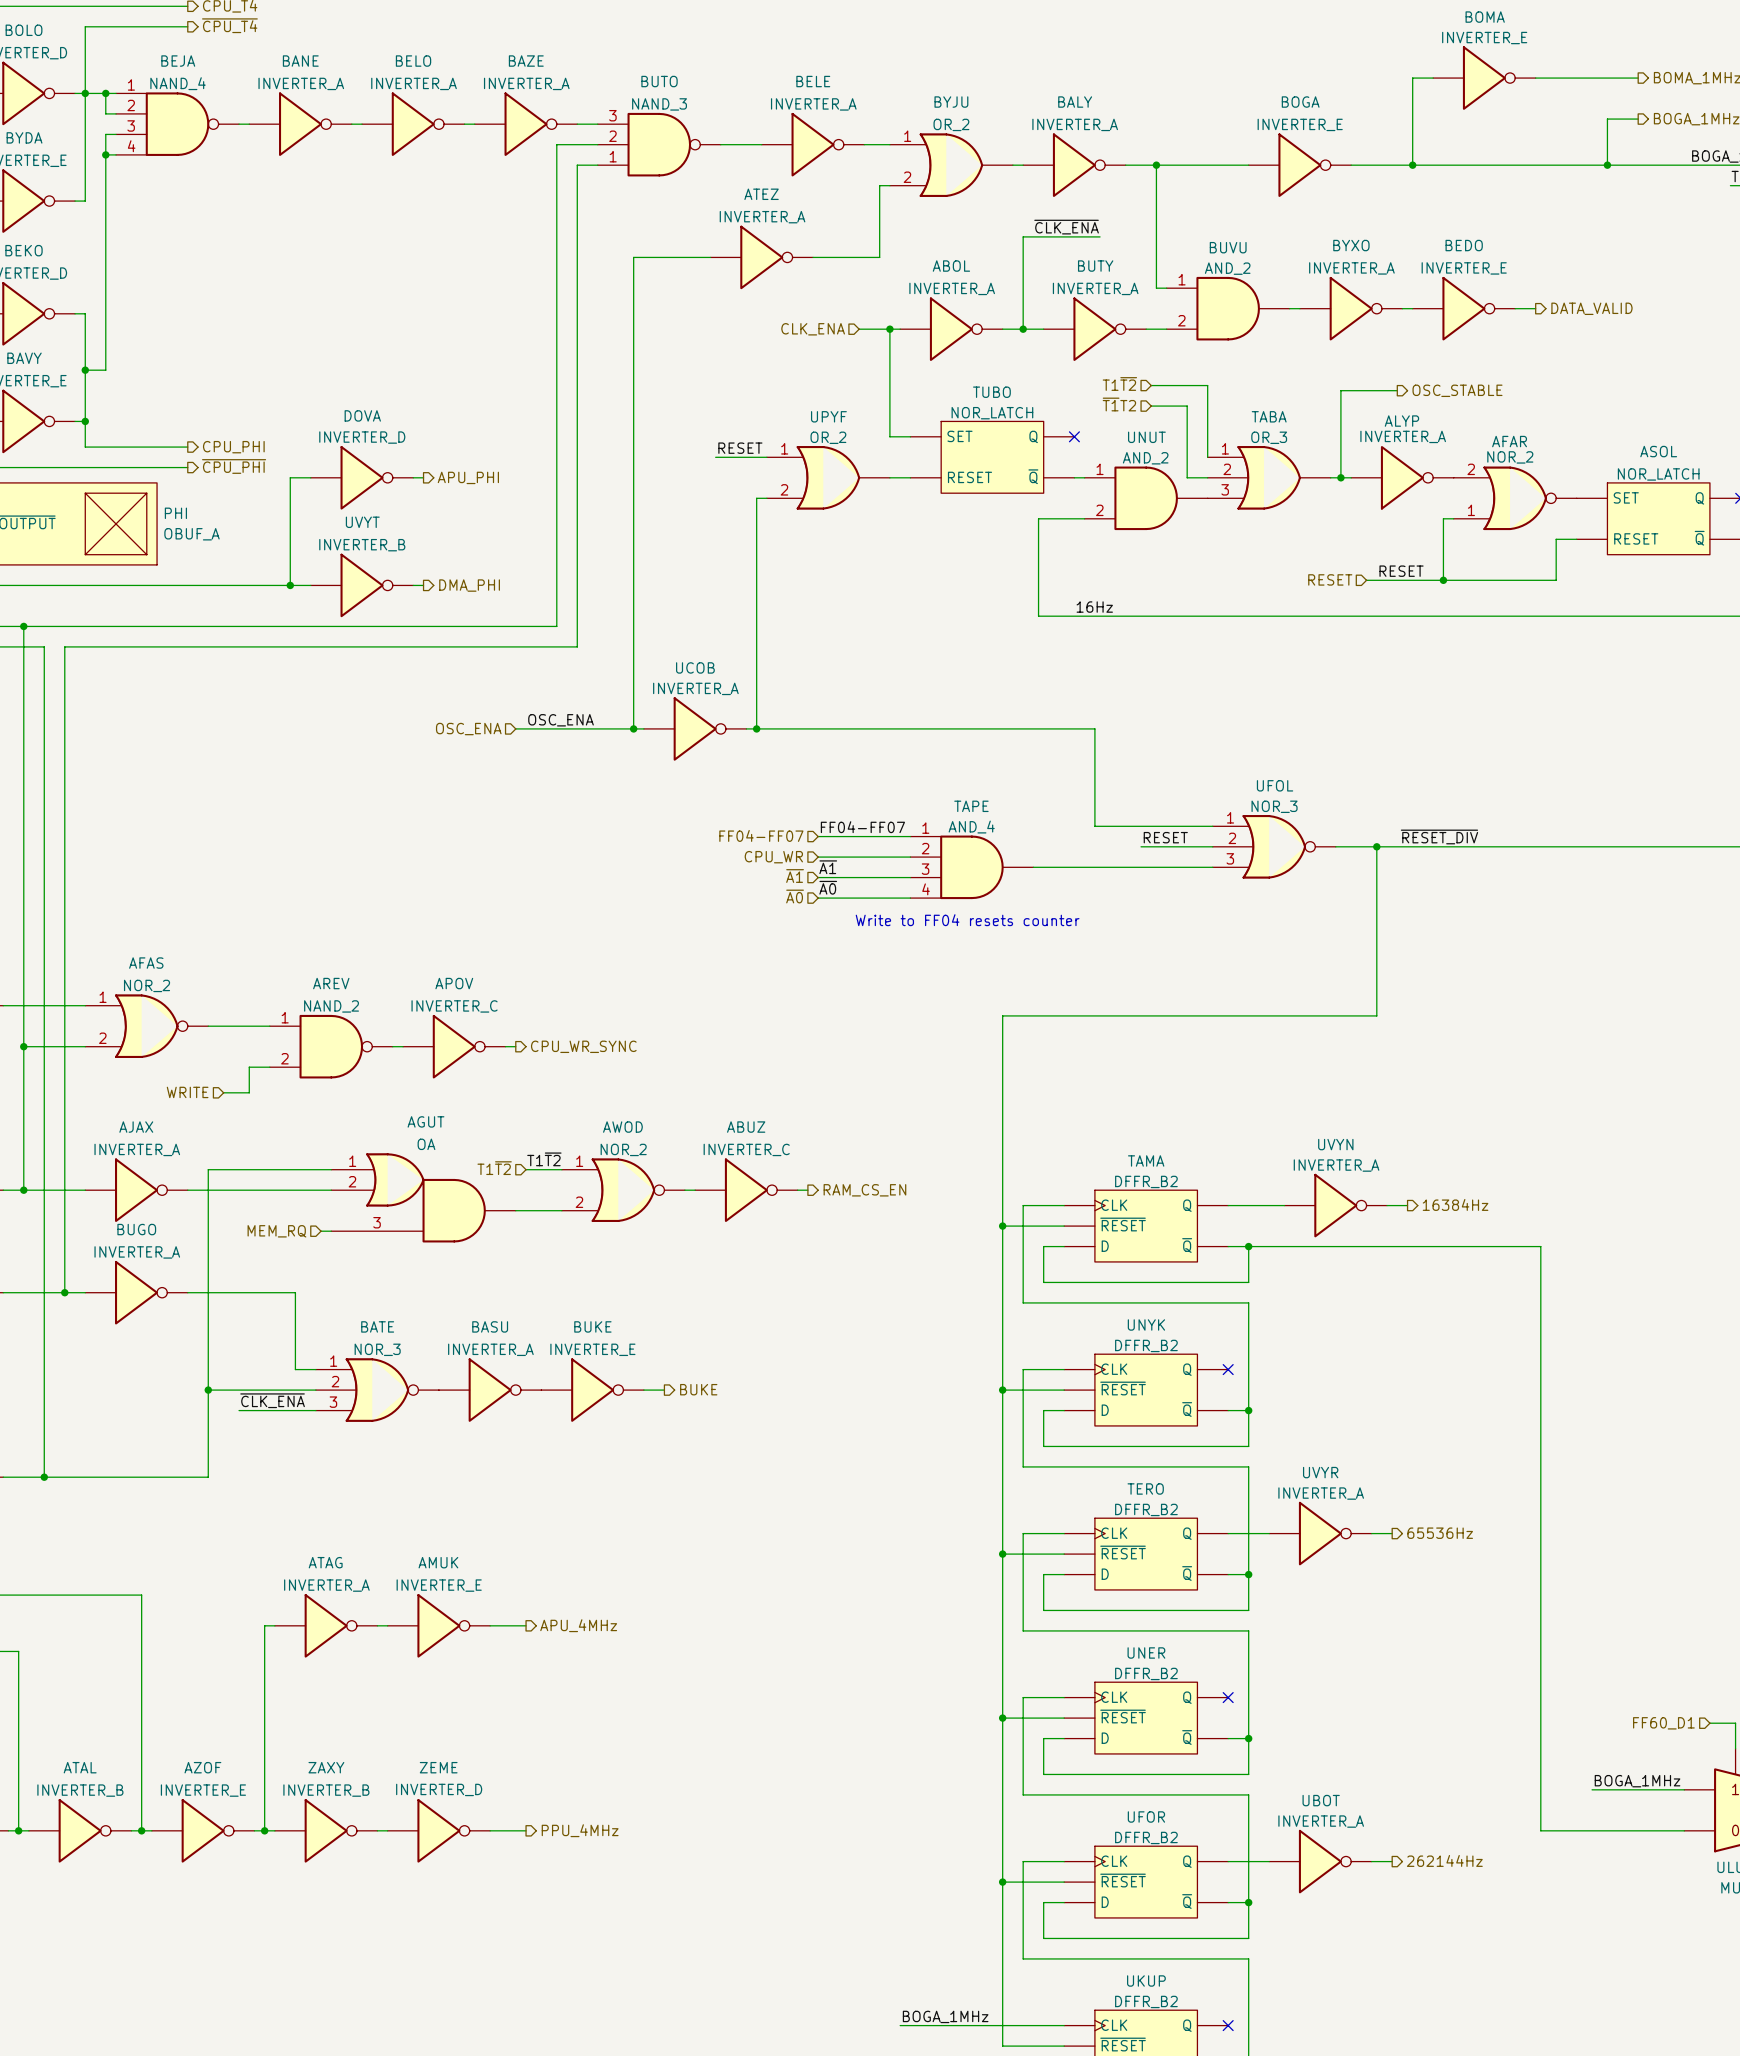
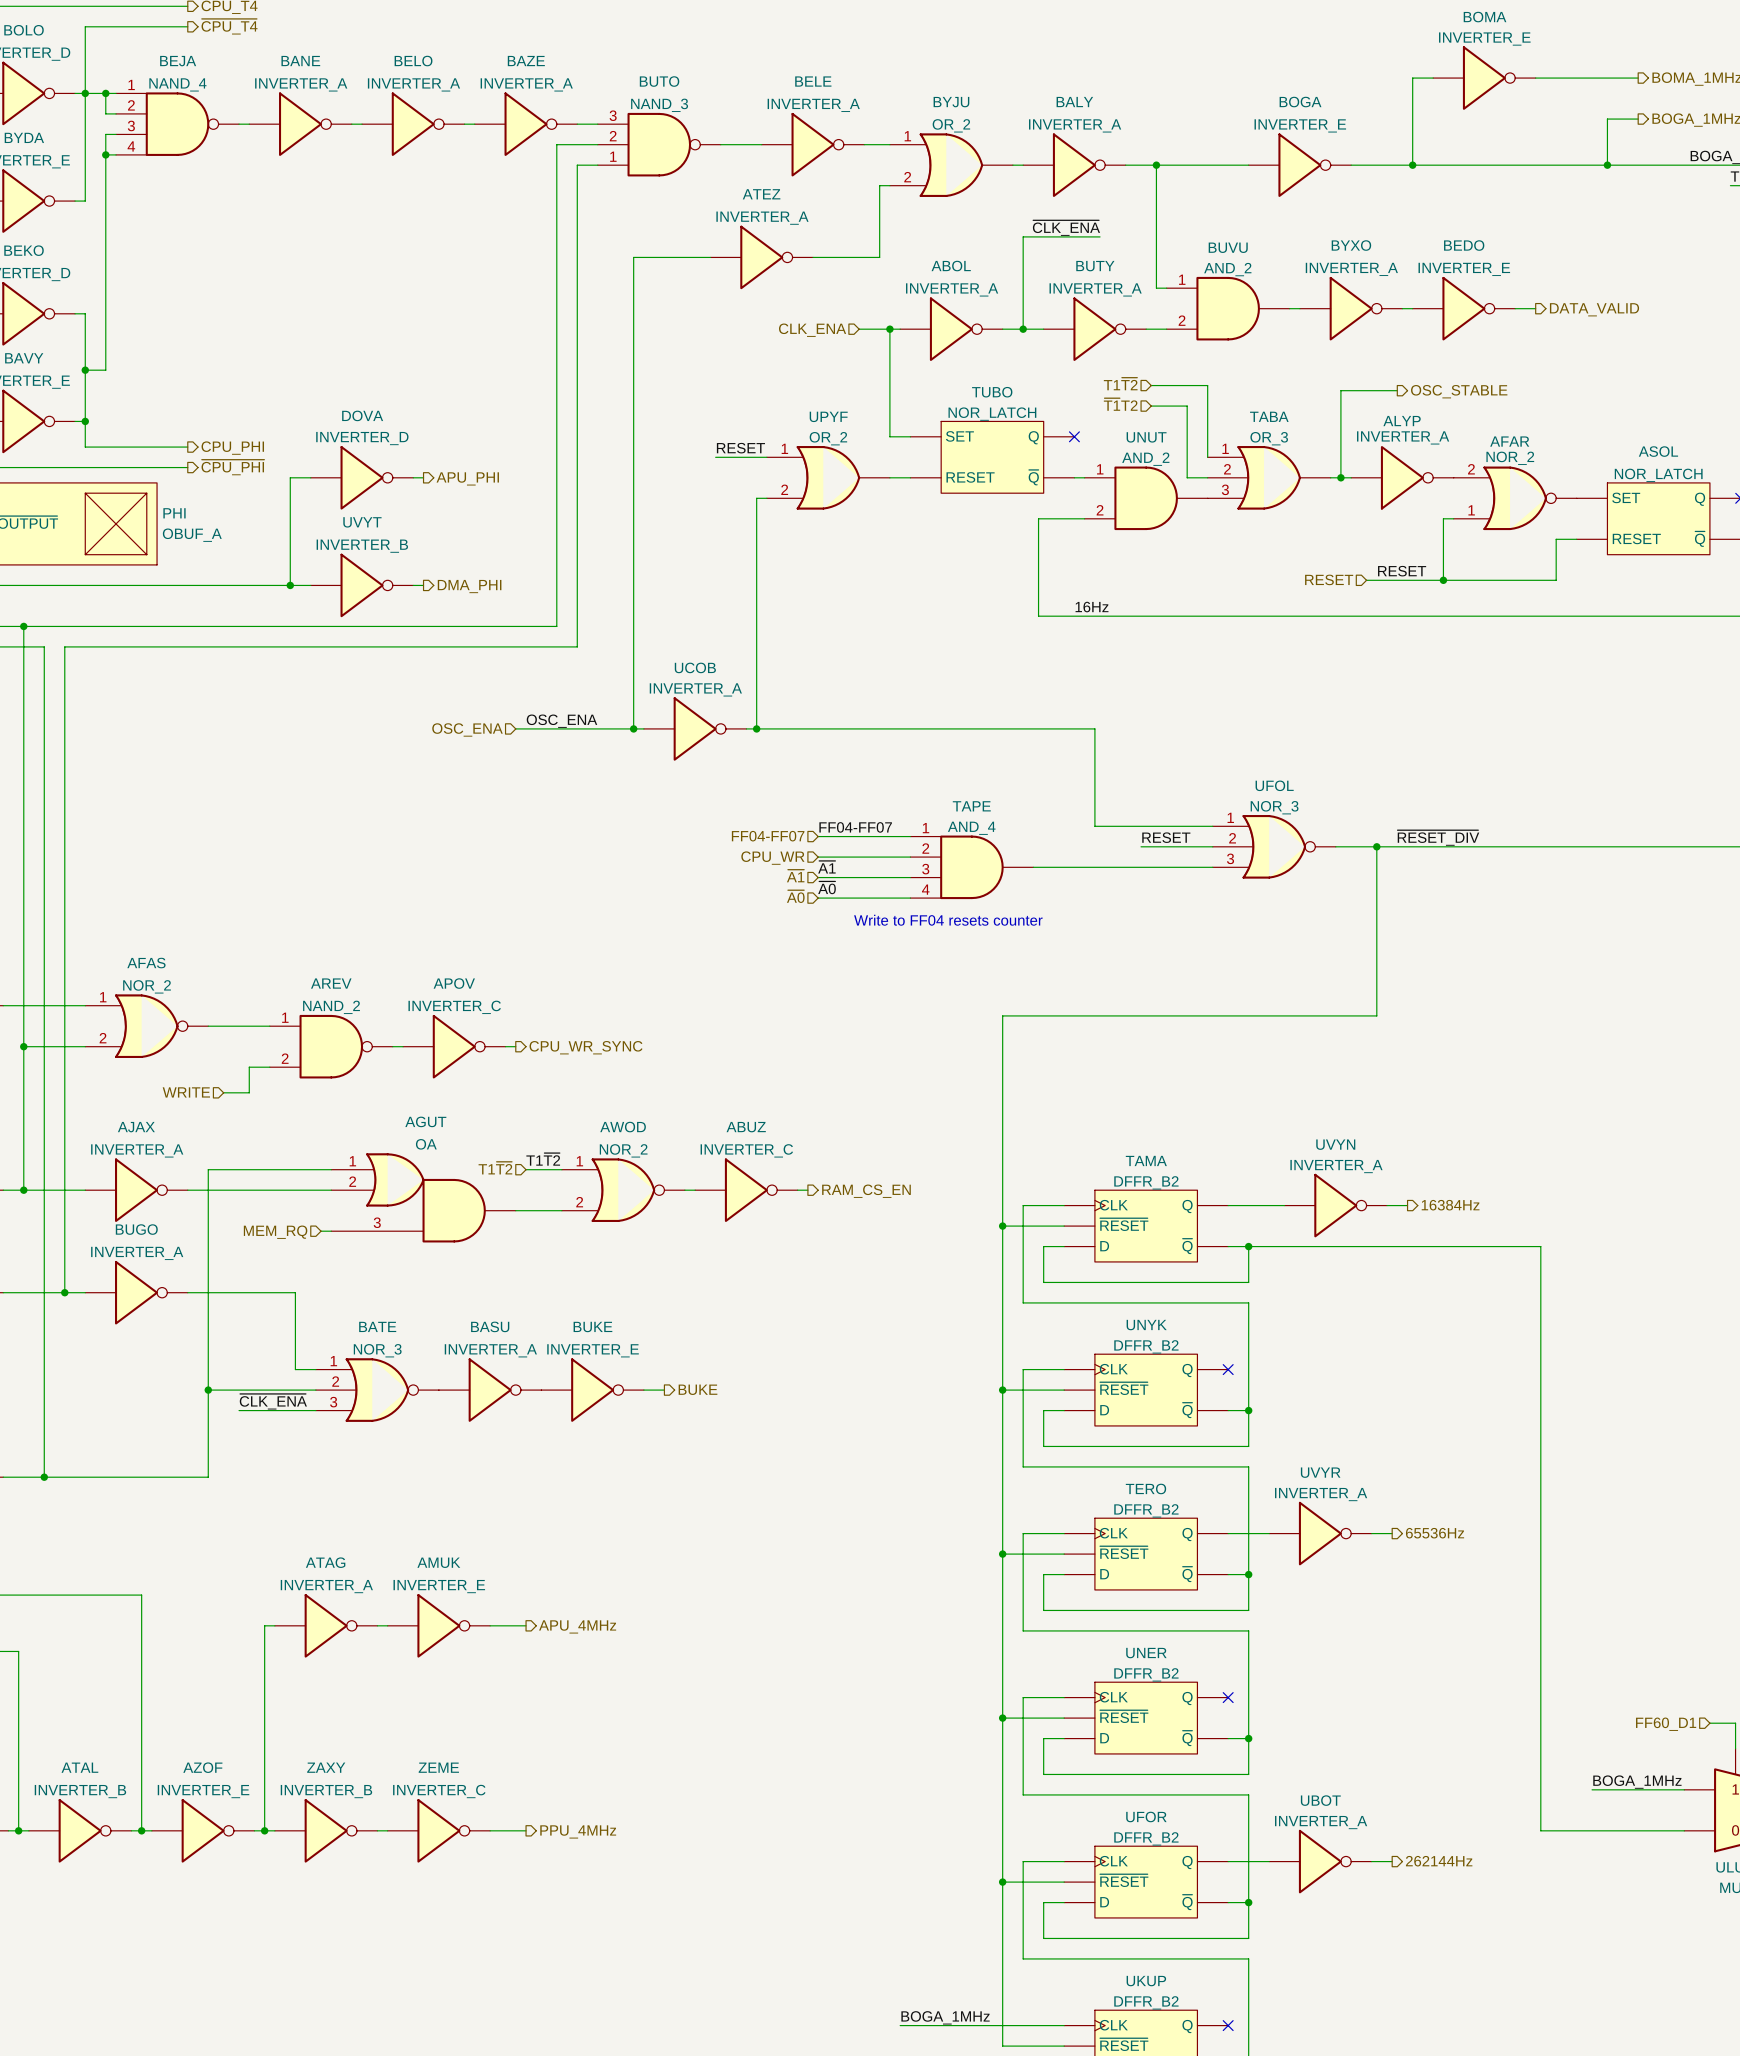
ZEME value: INVERTER_D (439, 1789) -> INVERTER_C (439, 1791)

